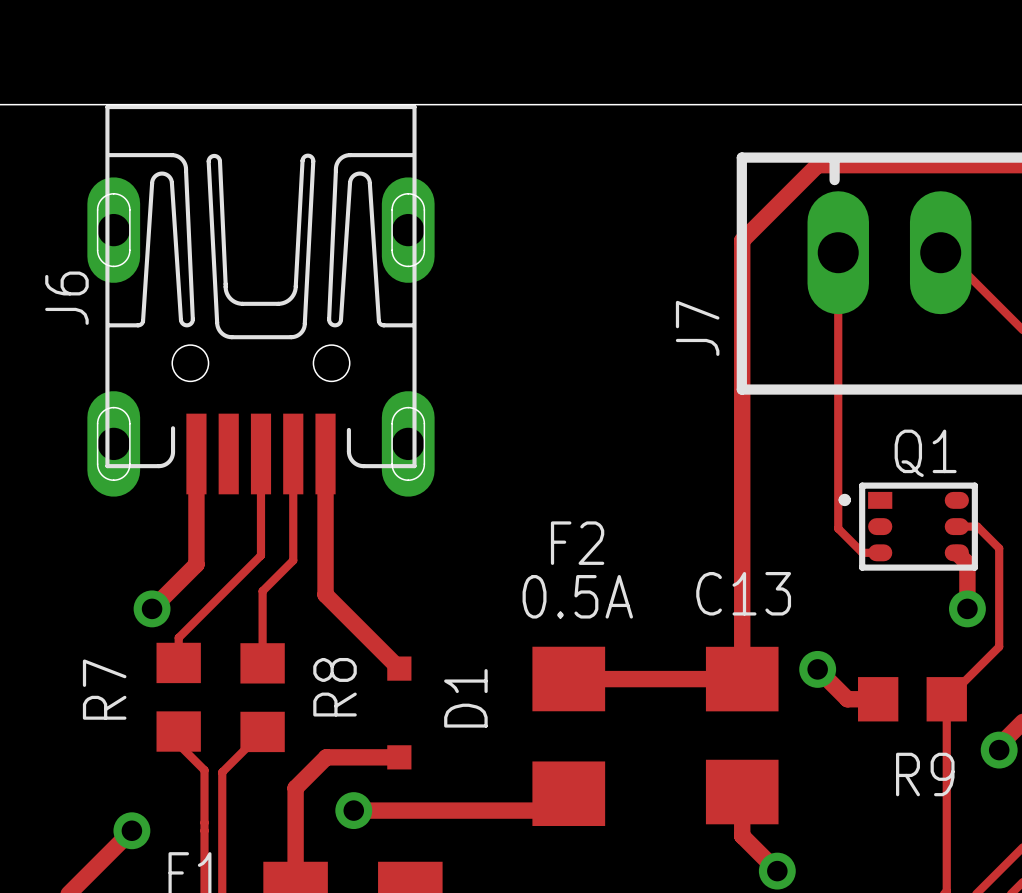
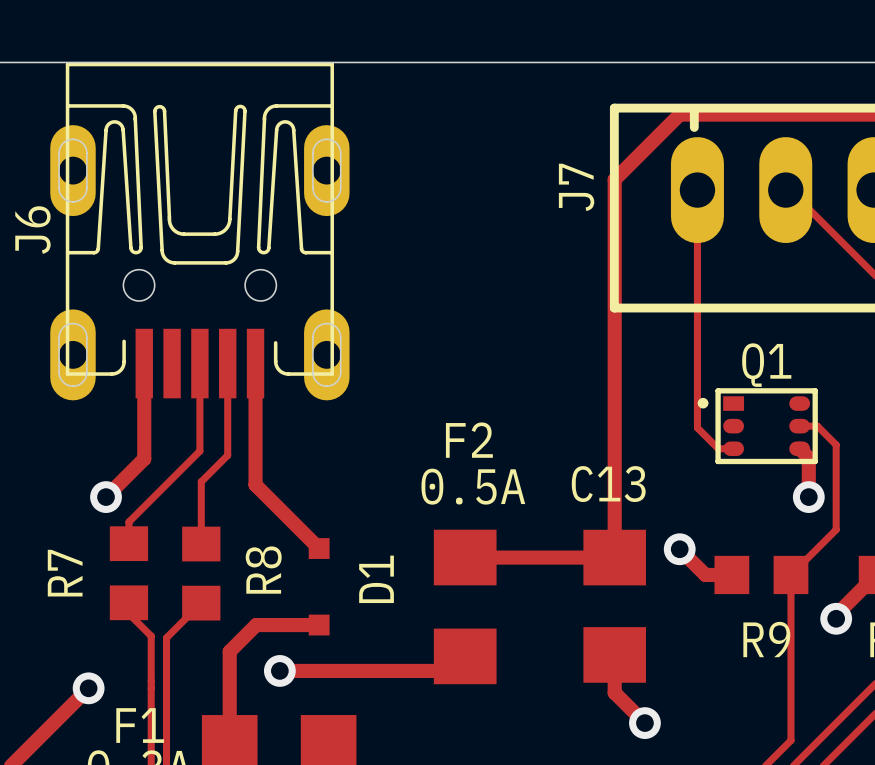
J7 name position: J7 (697, 328) -> J7 (576, 187)

